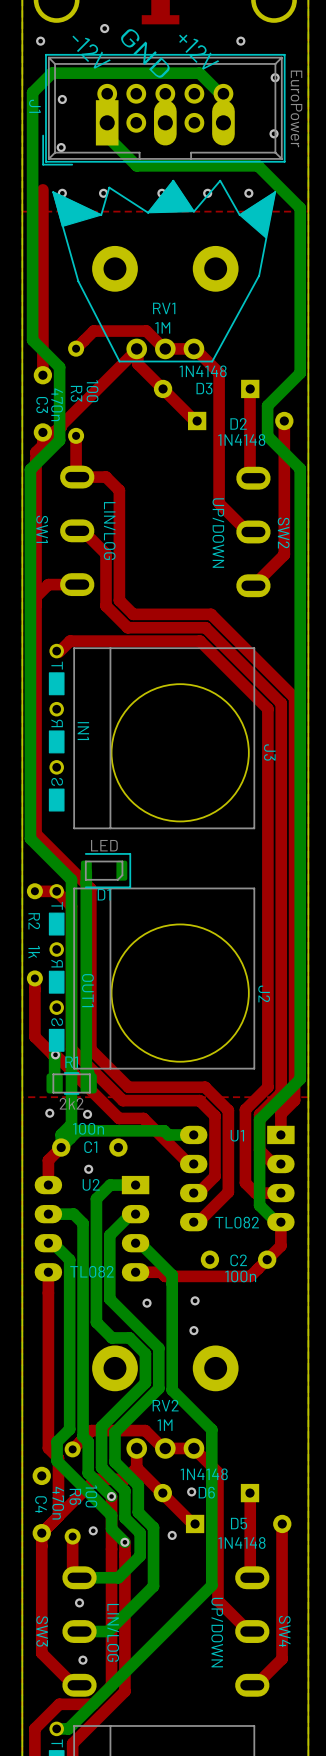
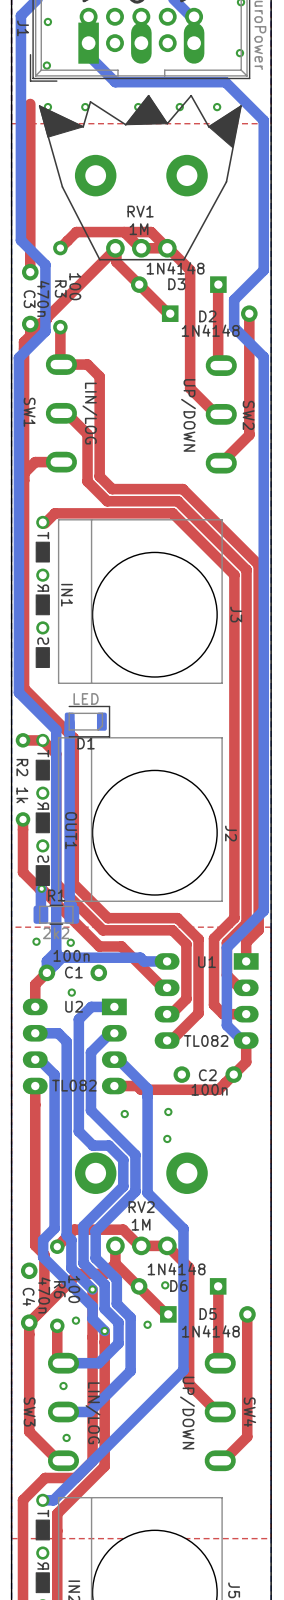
top track: none -> (124, 232) (151, 232) (167, 248)

